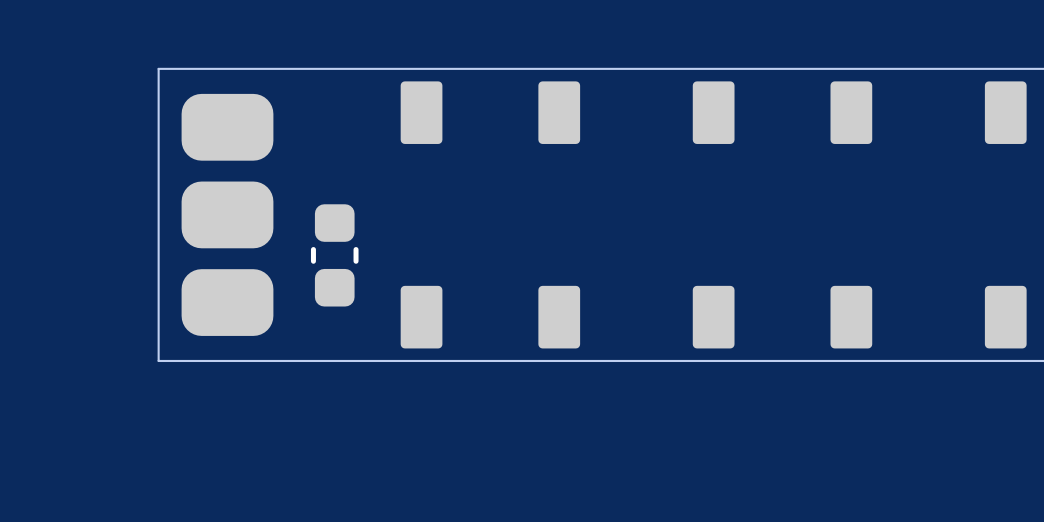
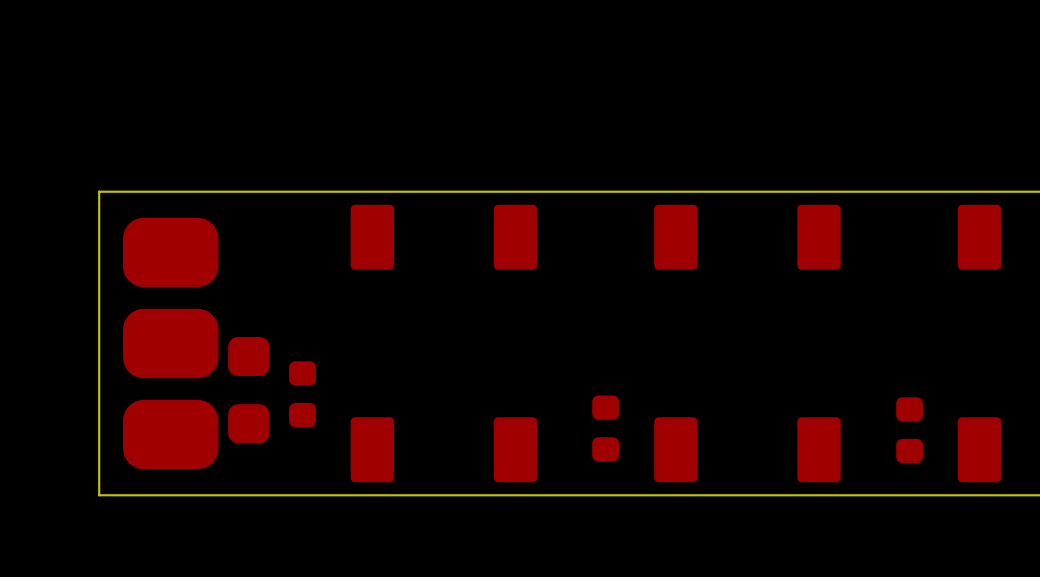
part: (334, 255) -> none
part: none -> (248, 390)
part: none -> (302, 394)
part: none -> (605, 428)
part: none -> (909, 430)

